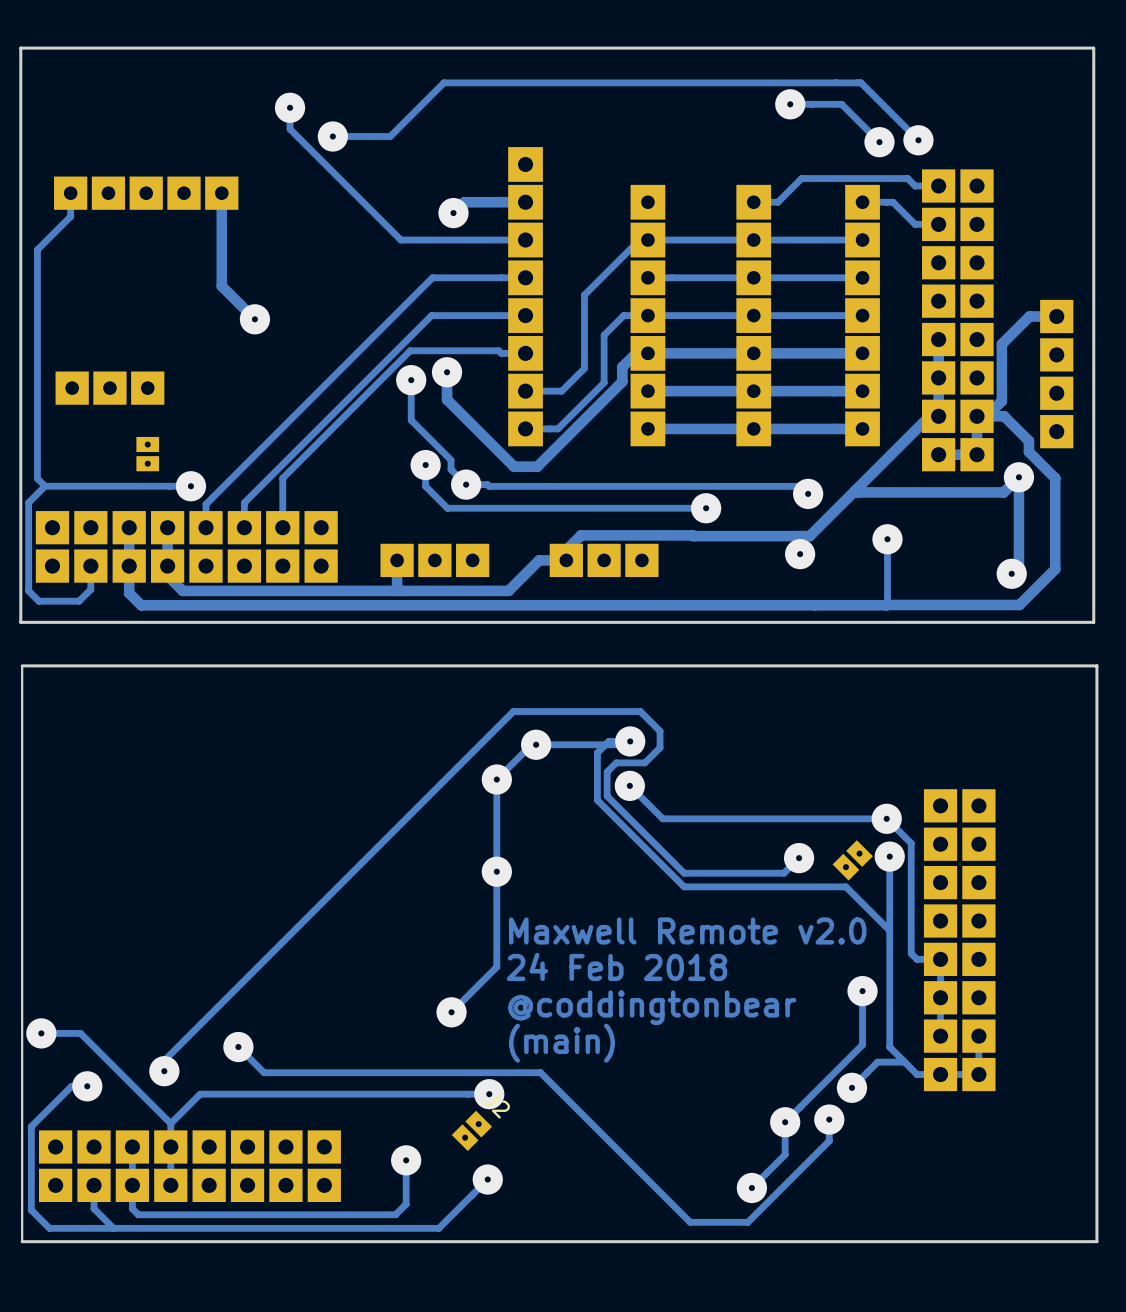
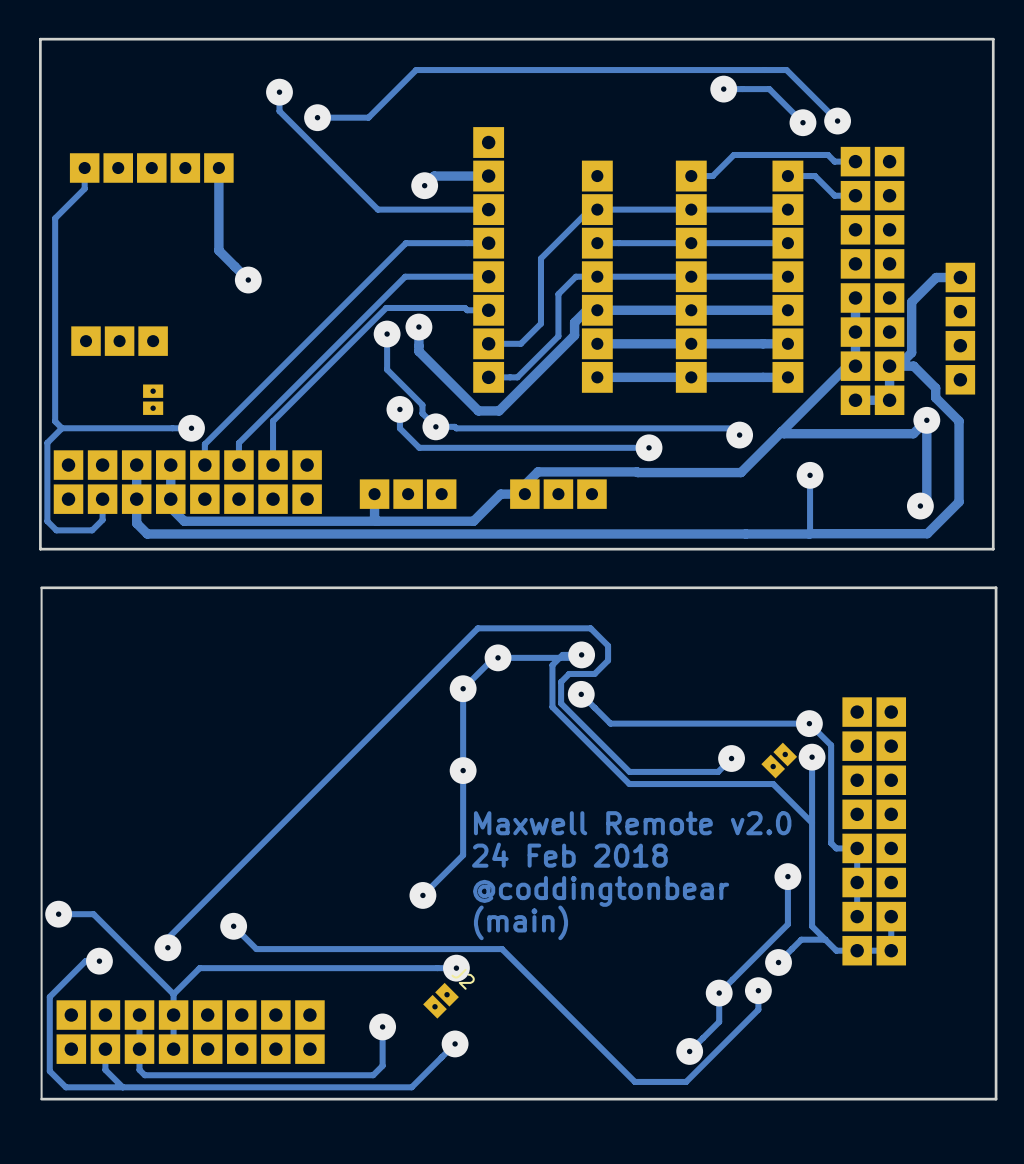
via: (800, 554) -> none

